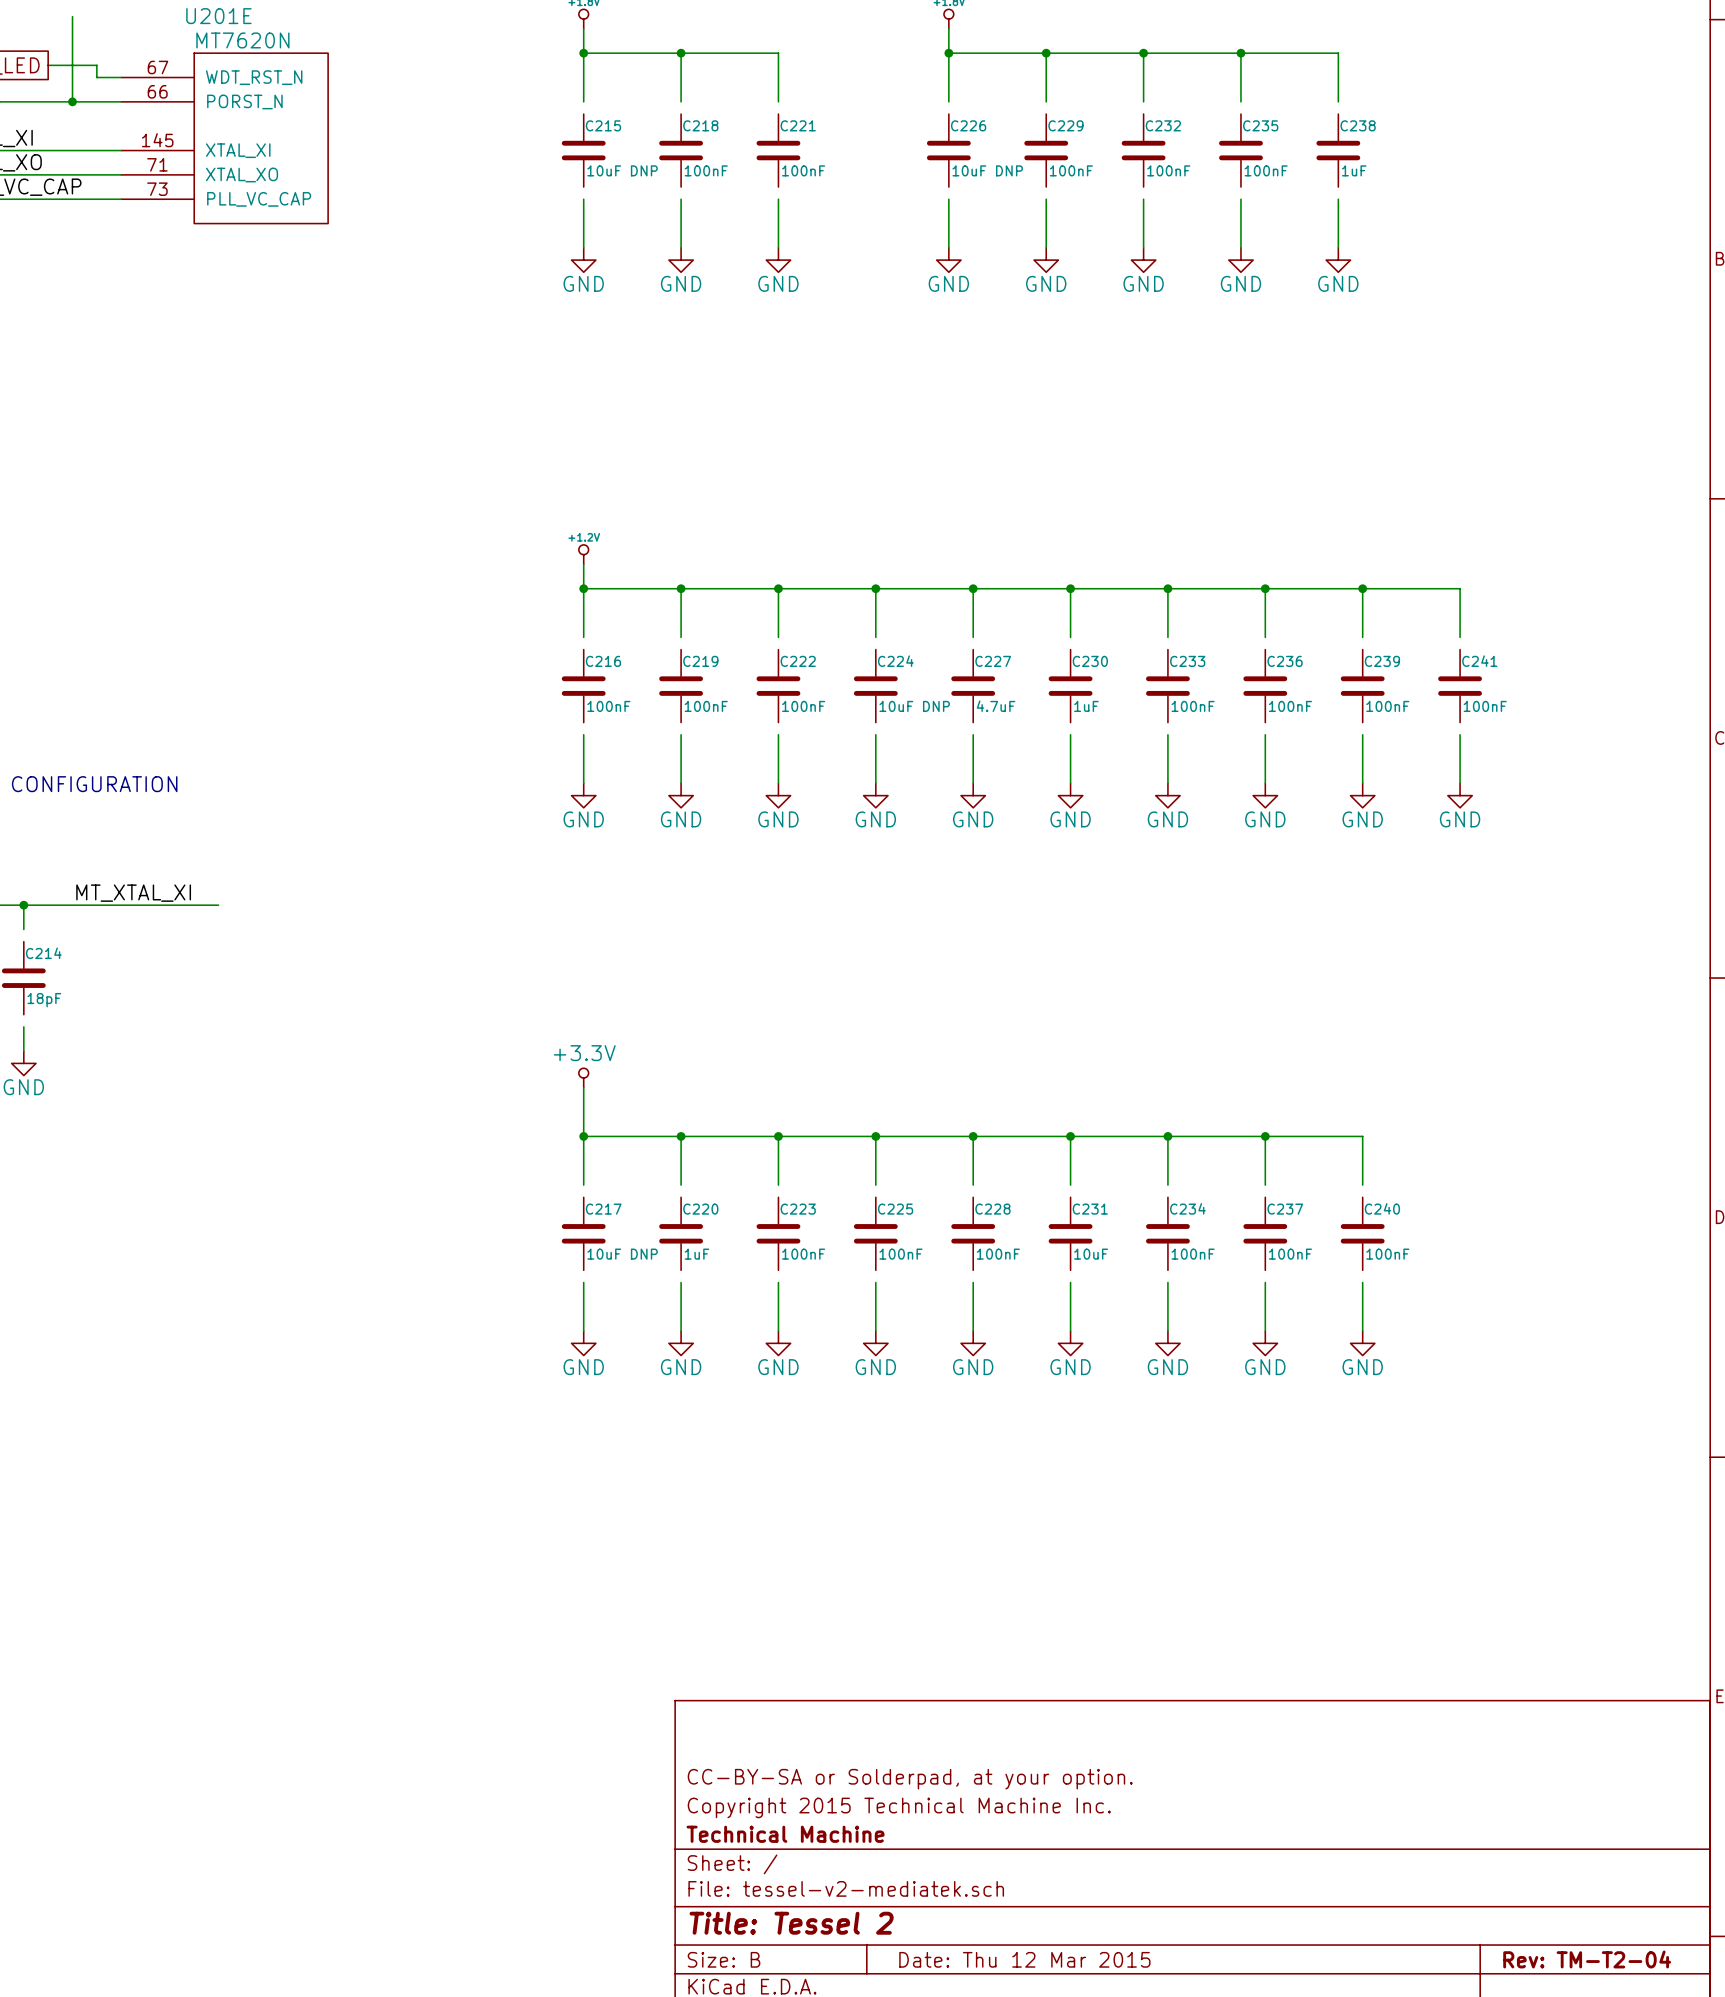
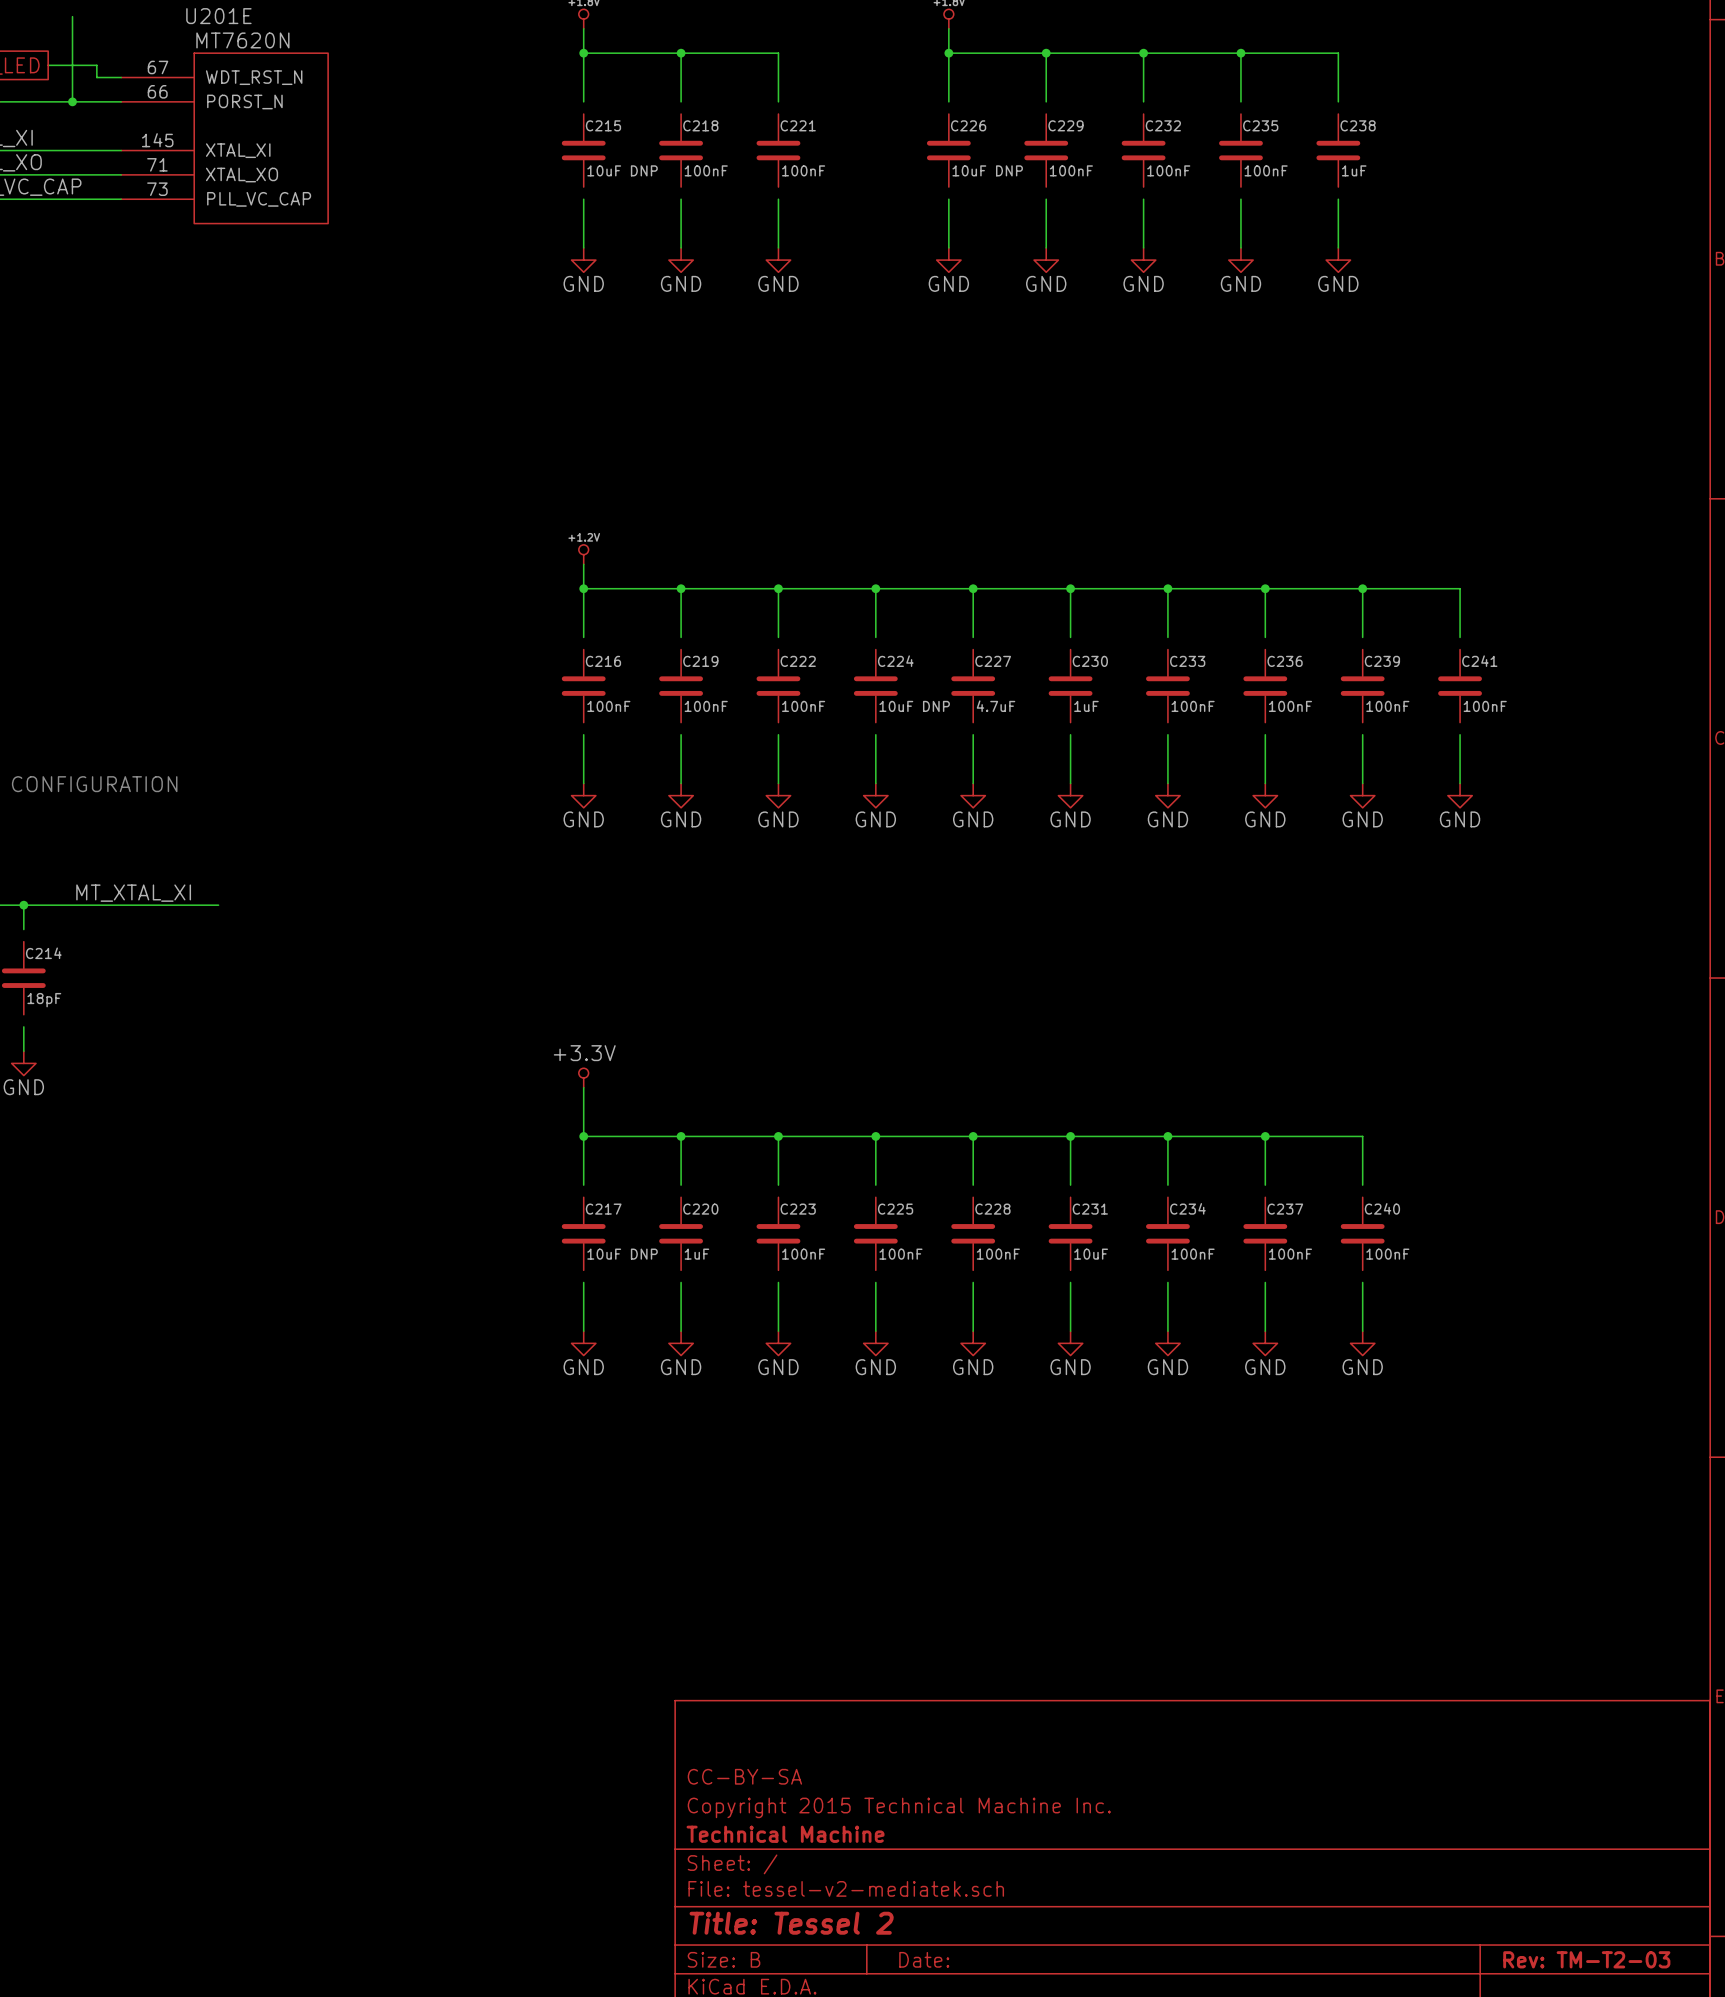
title block: CC-BY-SA or Solderpad, at your option. (910, 1779) -> CC-BY-SA (744, 1776)
title block: Date: Thu 12 Mar 2015 (1024, 1959) -> Date: (924, 1959)
title block: Rev: TM-T2-04 (1587, 1959) -> Rev: TM-T2-03 (1586, 1959)

